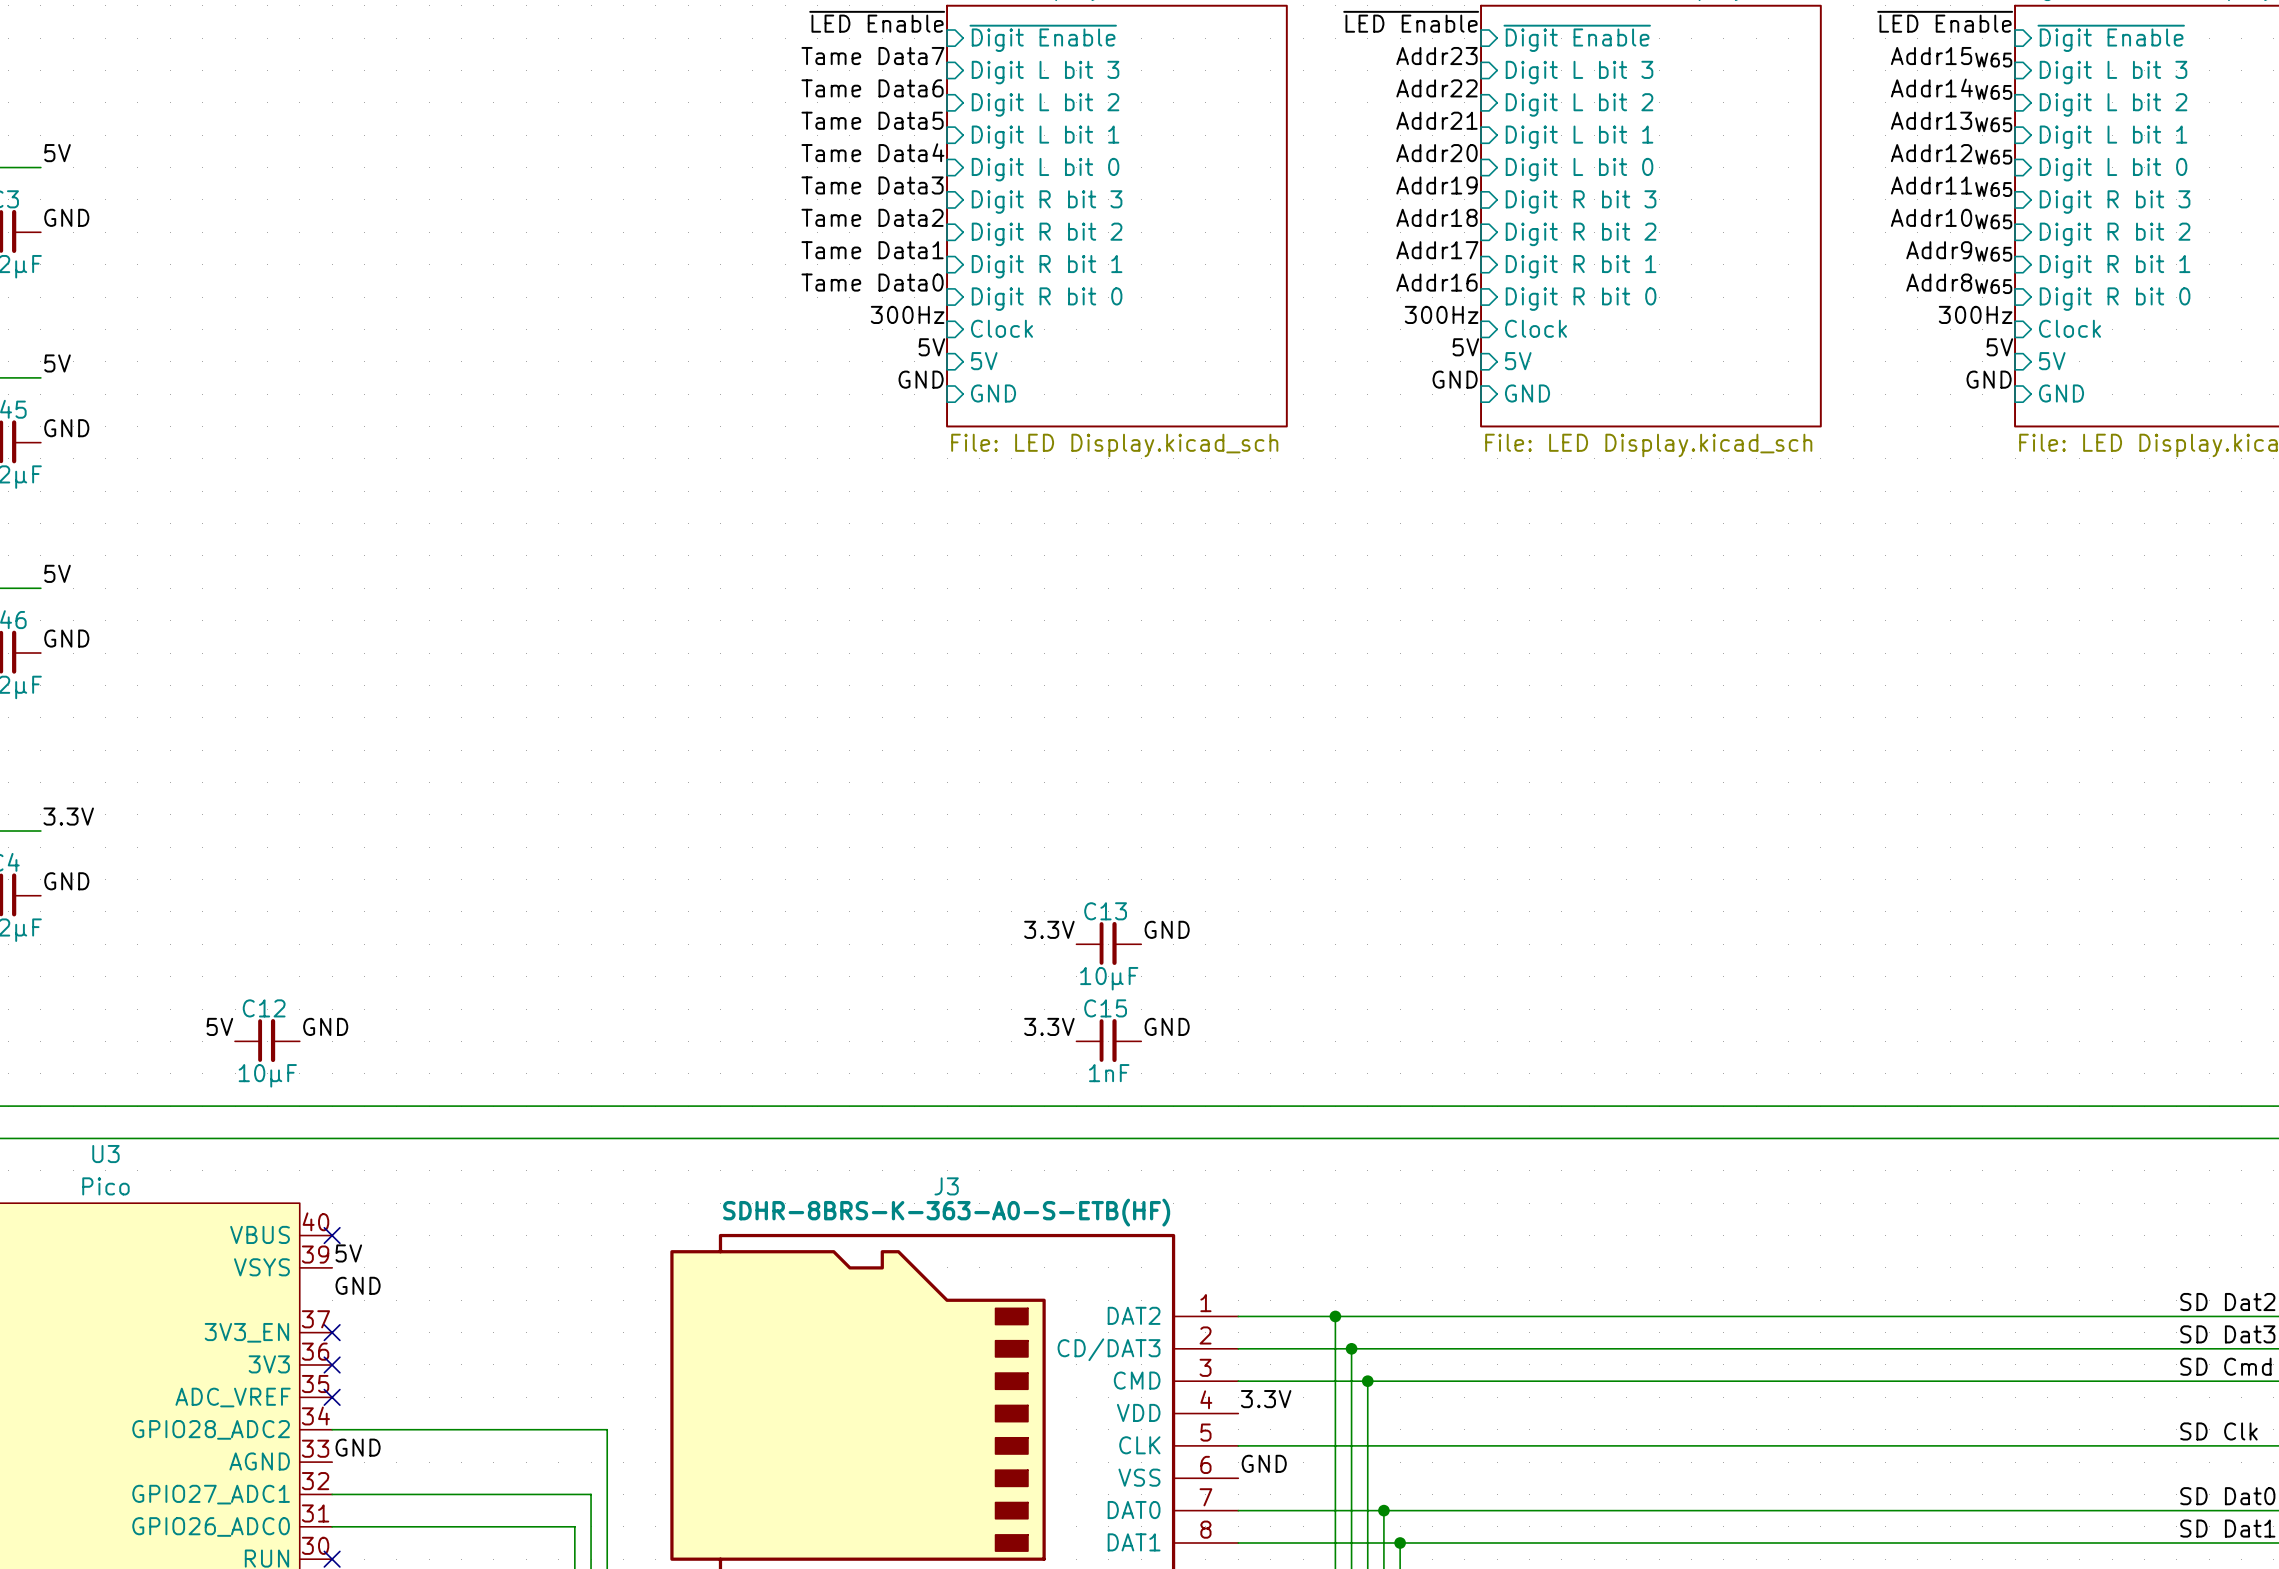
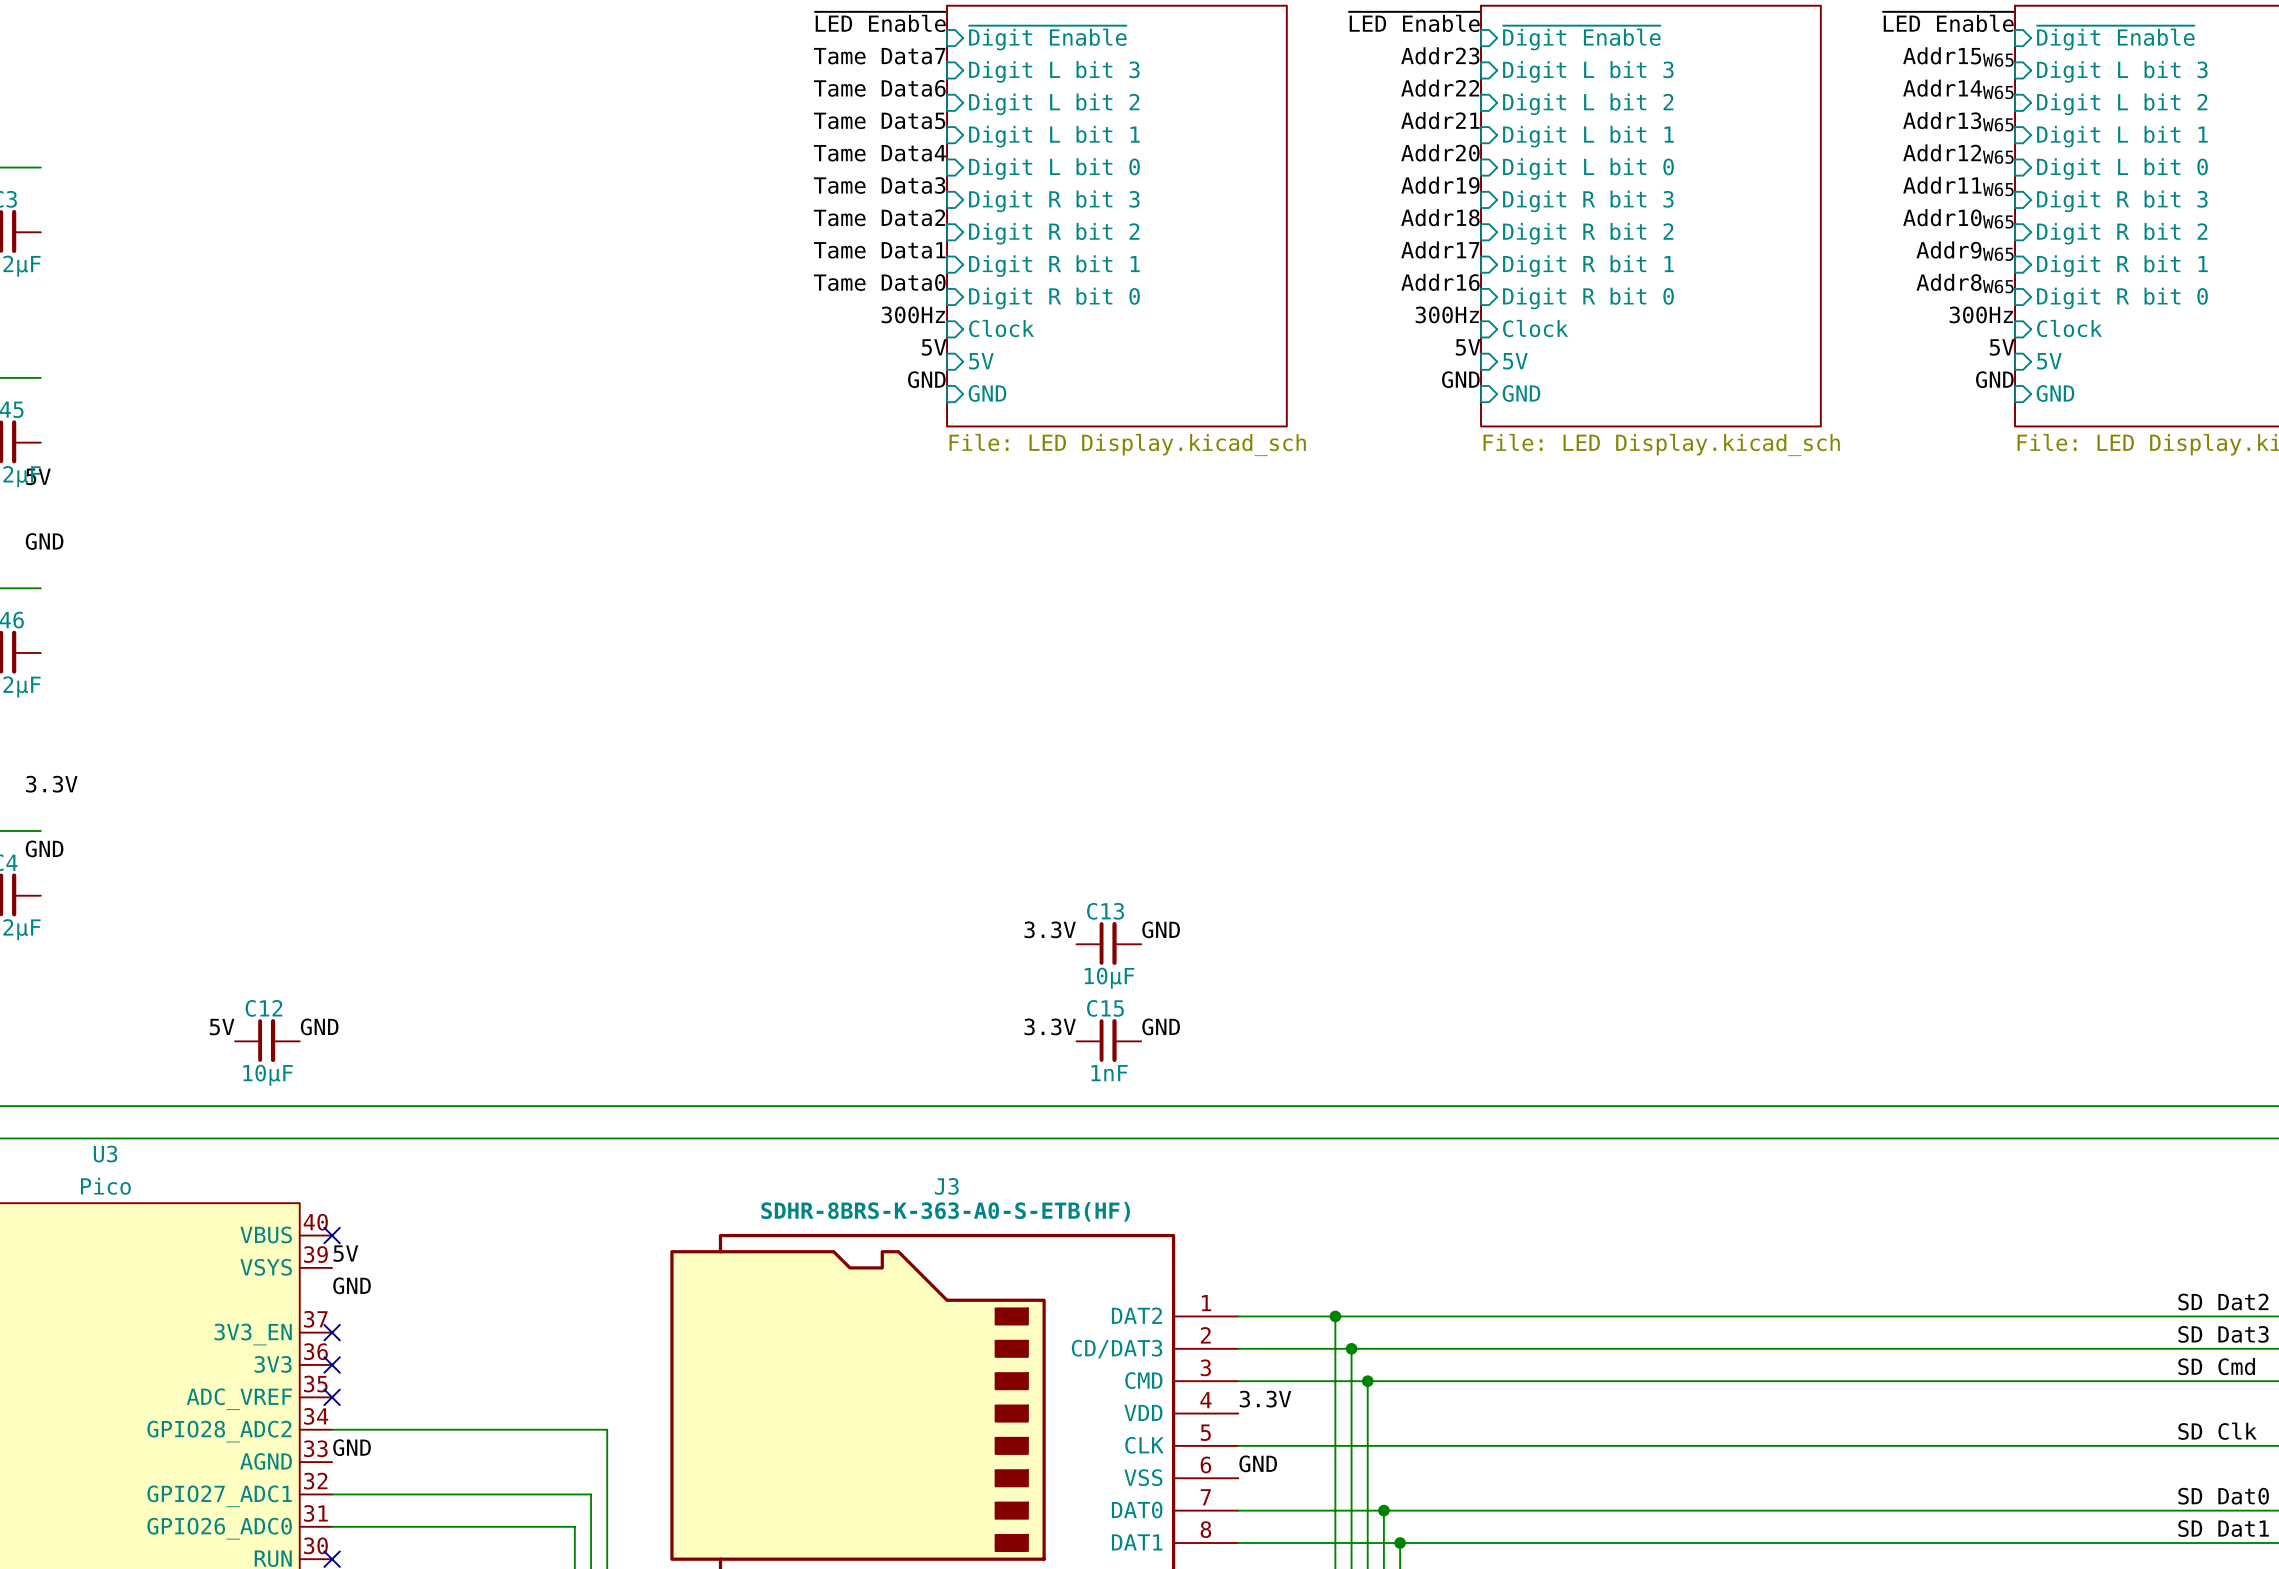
label: 5V (57, 153) -> none
label: GND (66, 217) -> none
label: 5V (57, 363) -> none
label: GND (66, 428) -> none
label: none -> 5V (38, 476)
label: none -> GND (44, 541)
label: 5V (57, 573) -> none
label: GND (66, 638) -> none
label position: 3.3V (68, 816) -> 3.3V (51, 784)
label position: GND (66, 881) -> GND (44, 848)

